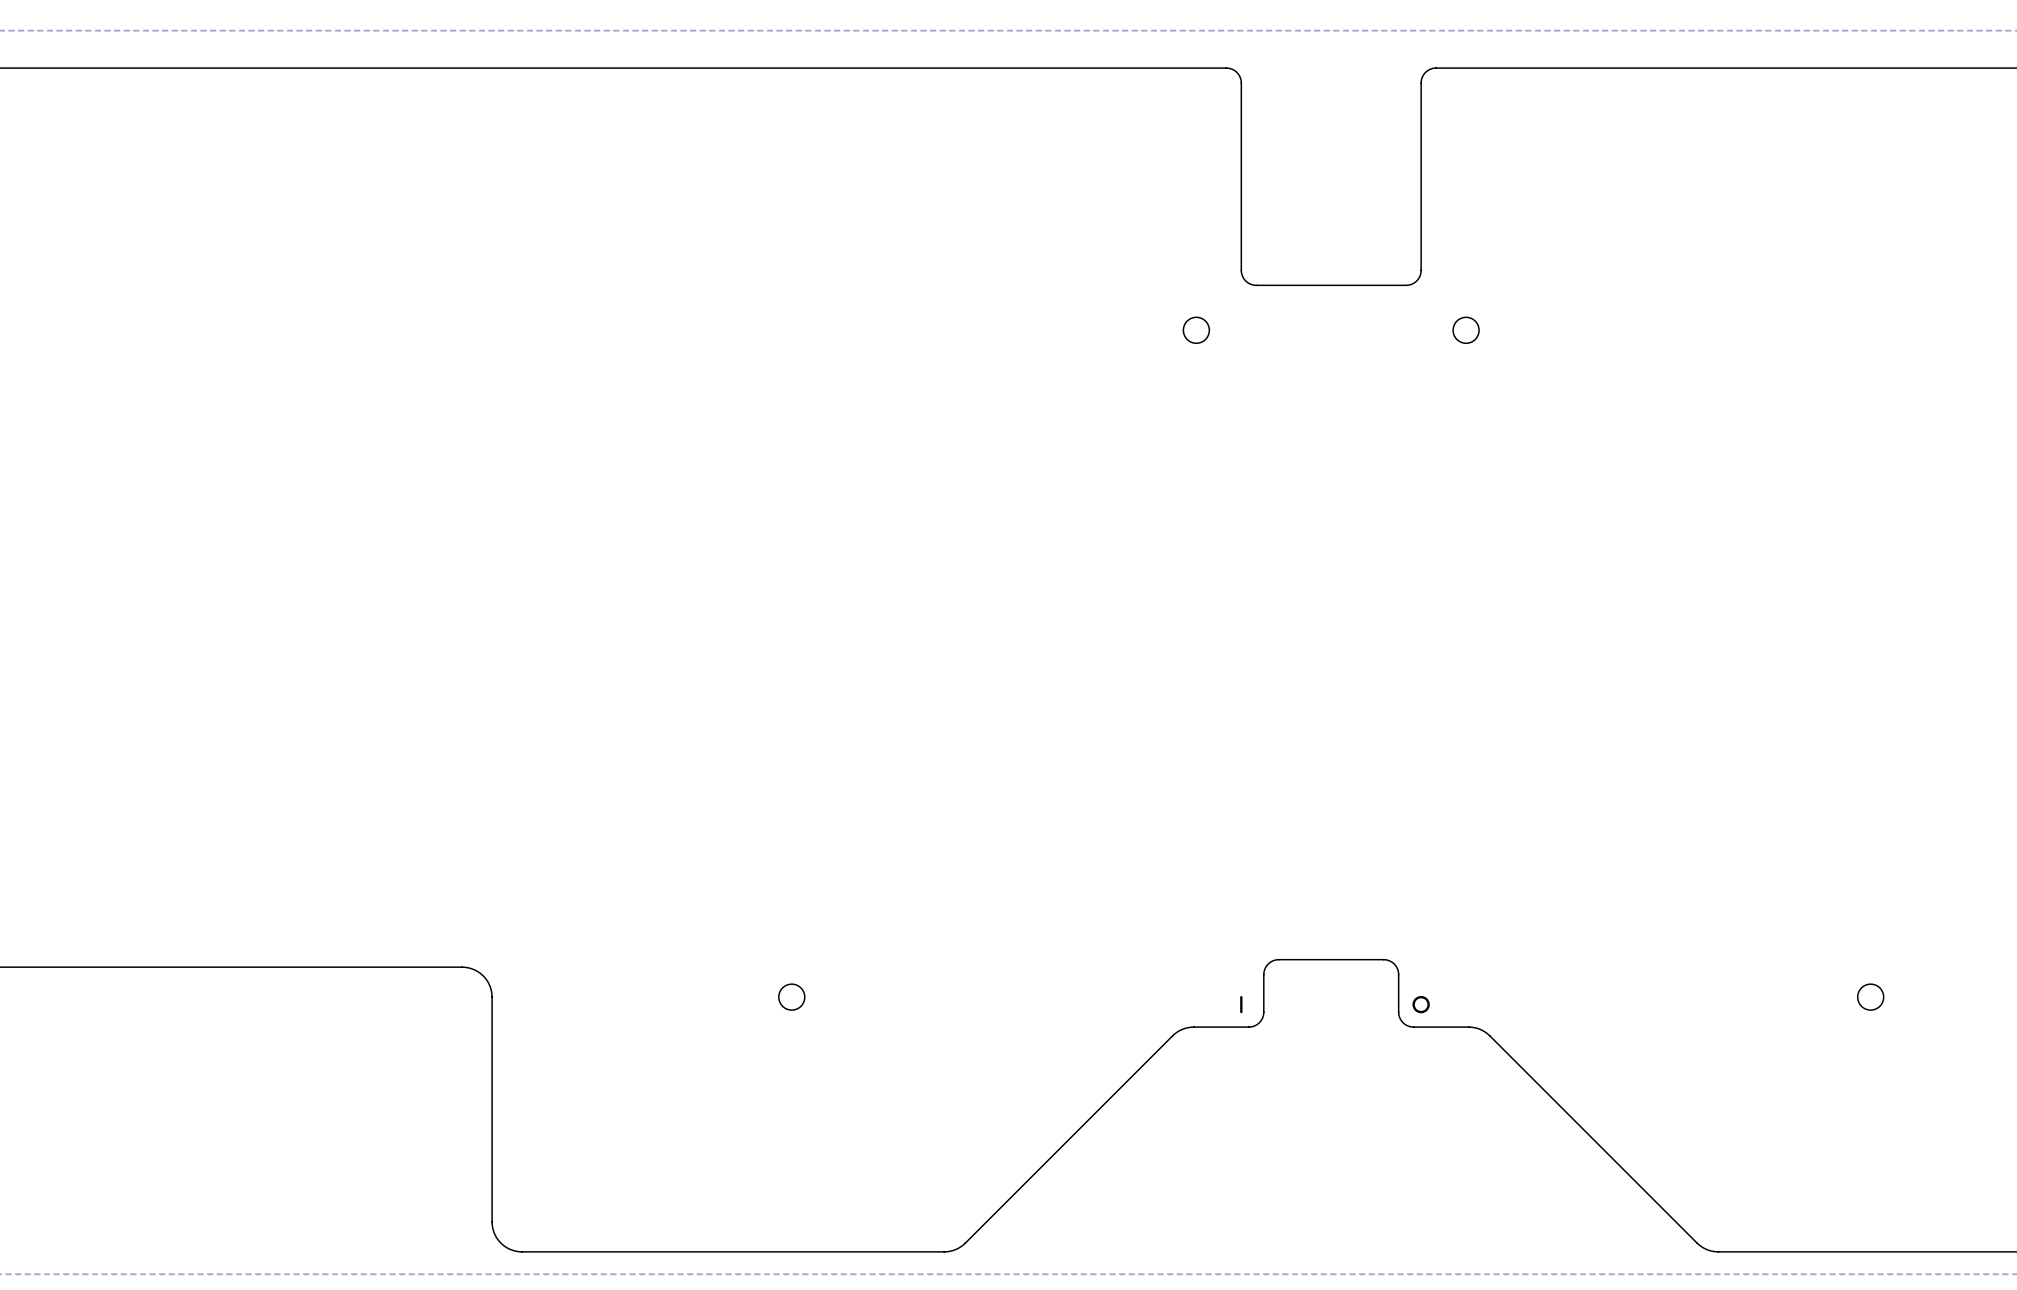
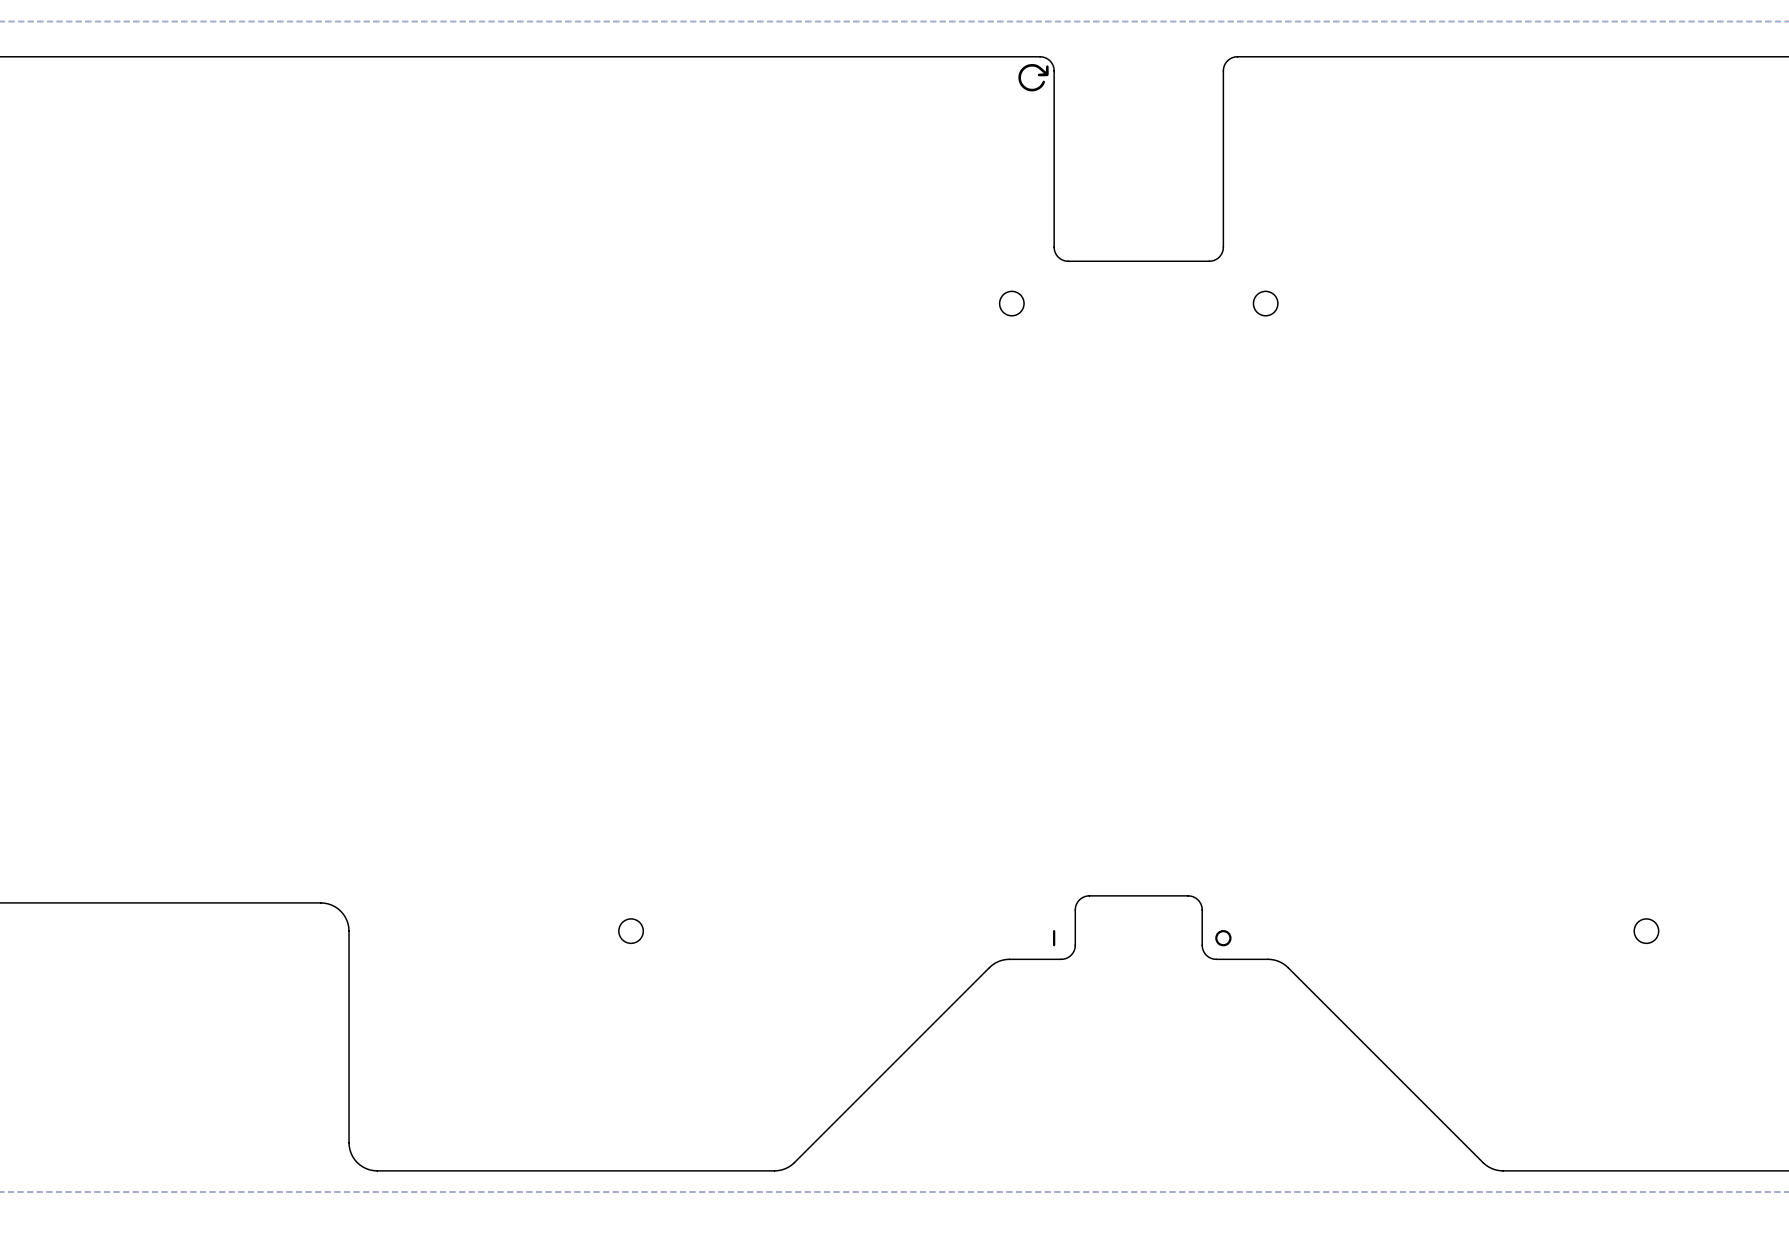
drawing: none -> [1018, 64, 1049, 92]

